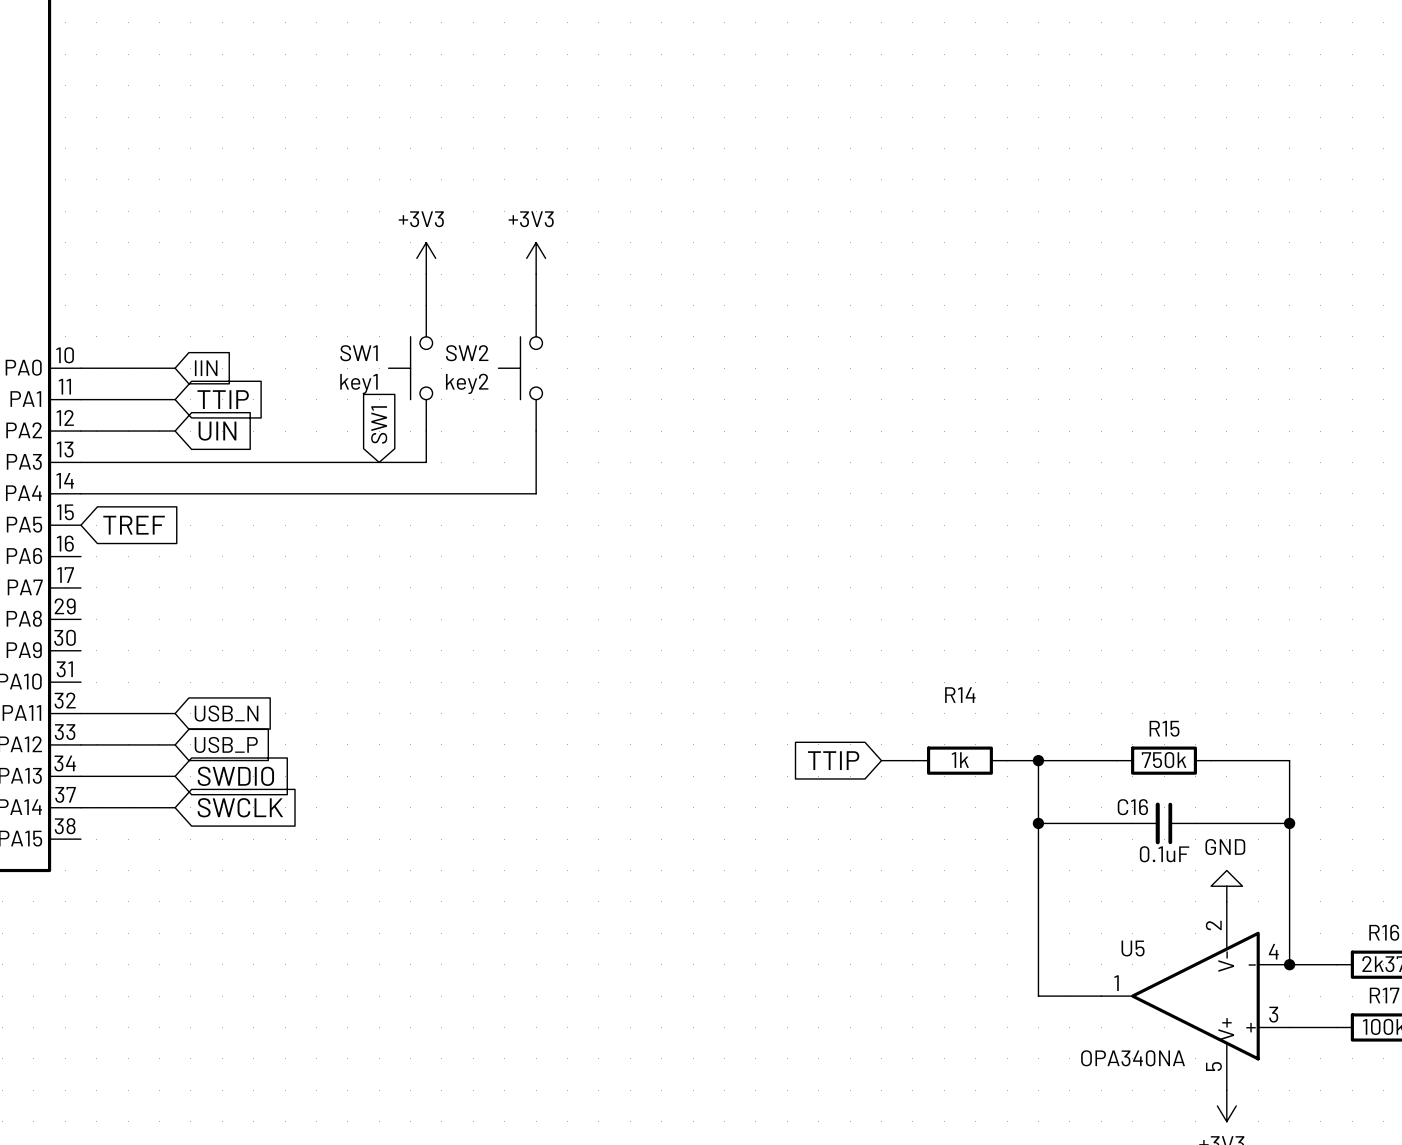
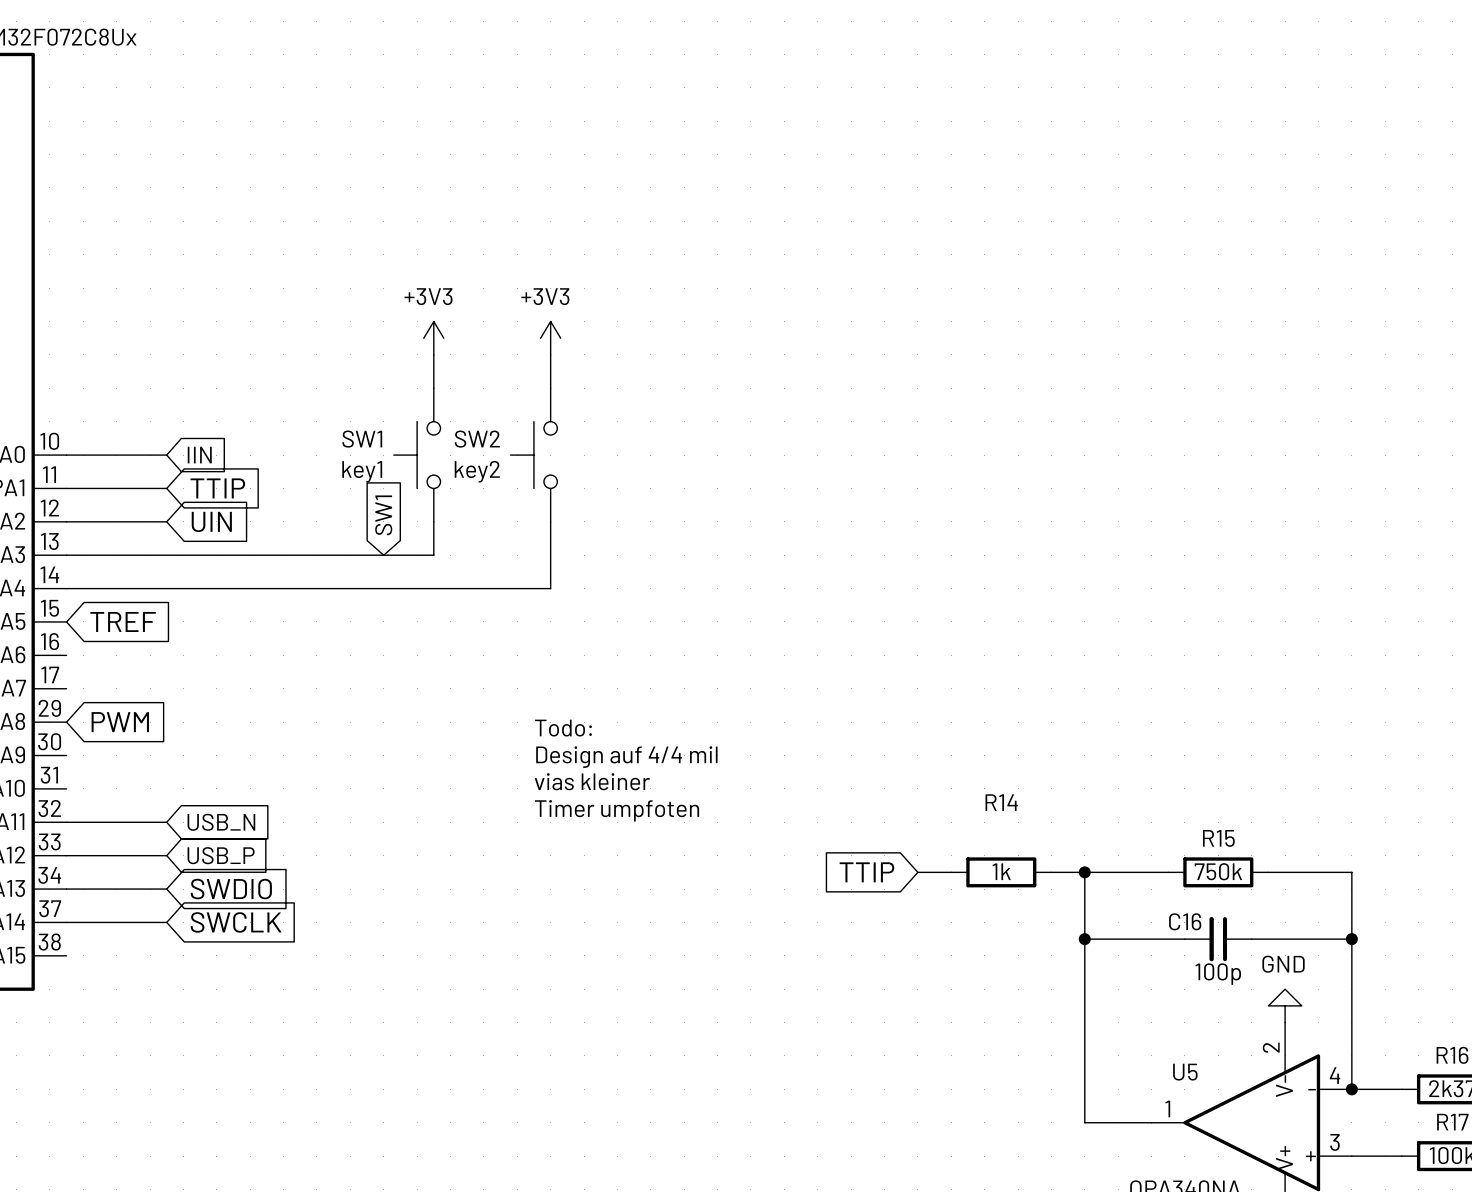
global label: none -> PWM (120, 722)
text: none -> Todo: (563, 728)
text: none -> Design auf 4/4 mil (626, 757)
text: none -> vias kleiner (592, 781)
text: none -> Timer umpfoten (617, 810)
C16 value: 0.1uF (1164, 854) -> 100p (1218, 974)

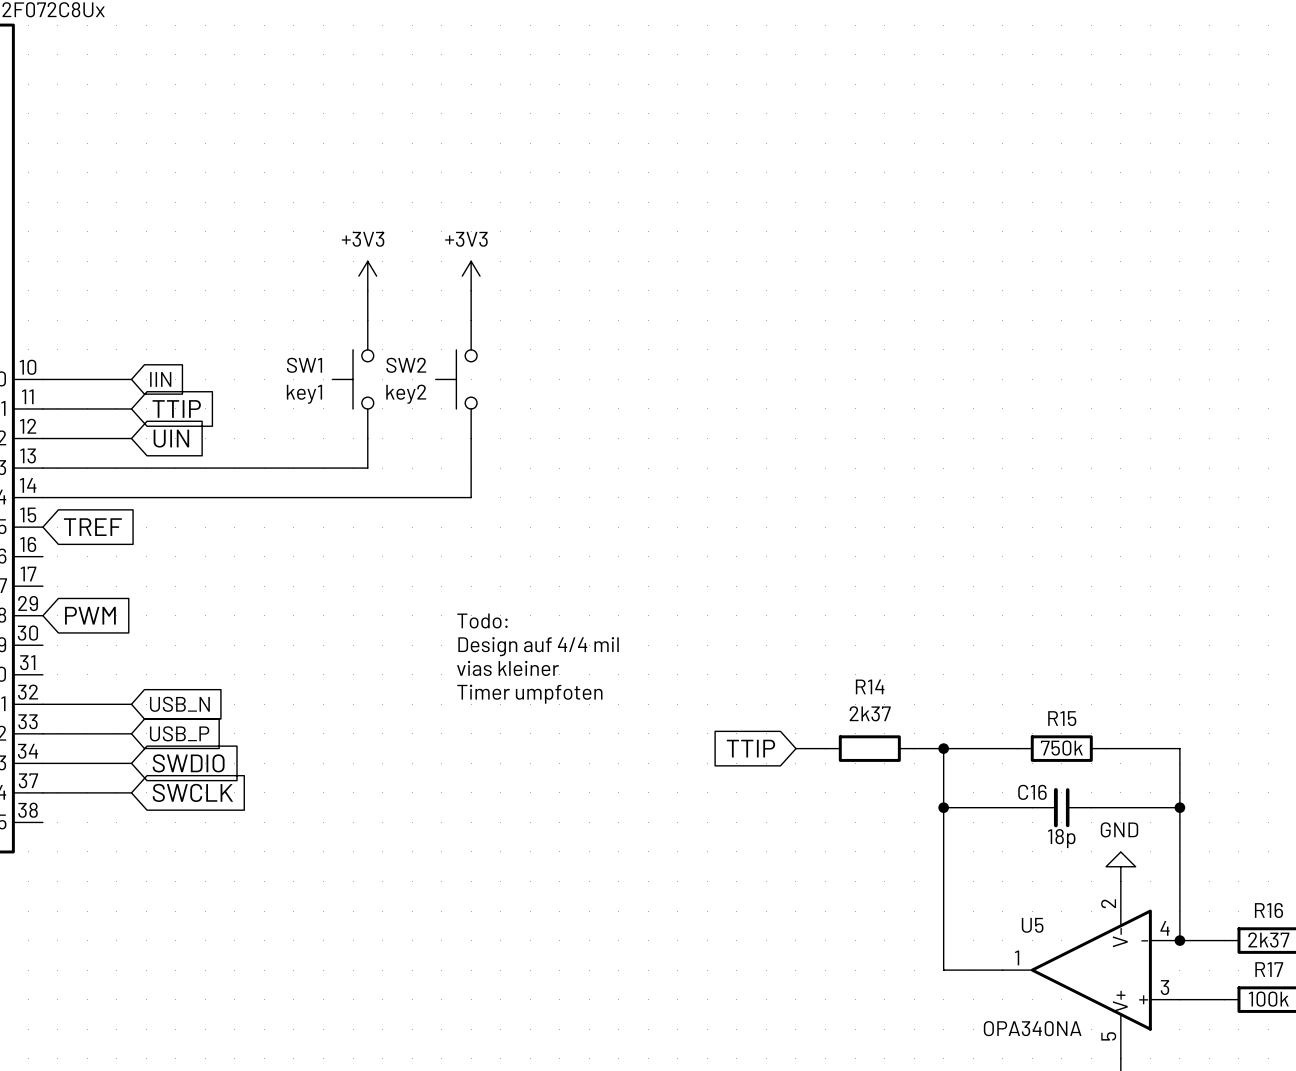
global label: SW1 (383, 515) -> none
R14 value: 1k (1001, 871) -> 2k37 (870, 713)
C16 value: 100p (1218, 974) -> 18p (1061, 838)

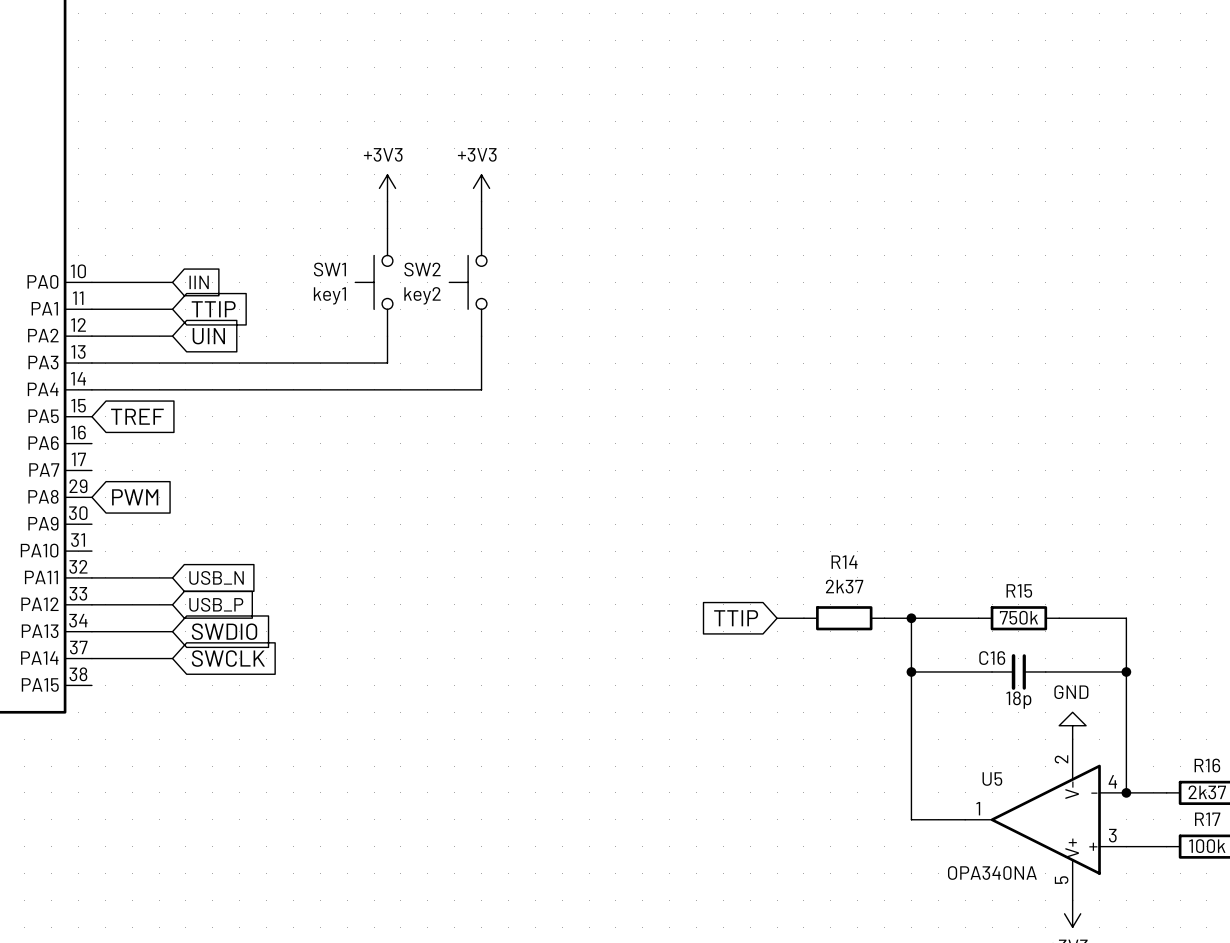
text: Todo: (482, 620) -> none
text: Design auf 4/4 mil (538, 646) -> none
text: vias kleiner (507, 668) -> none
text: Timer umpfoten (529, 694) -> none

